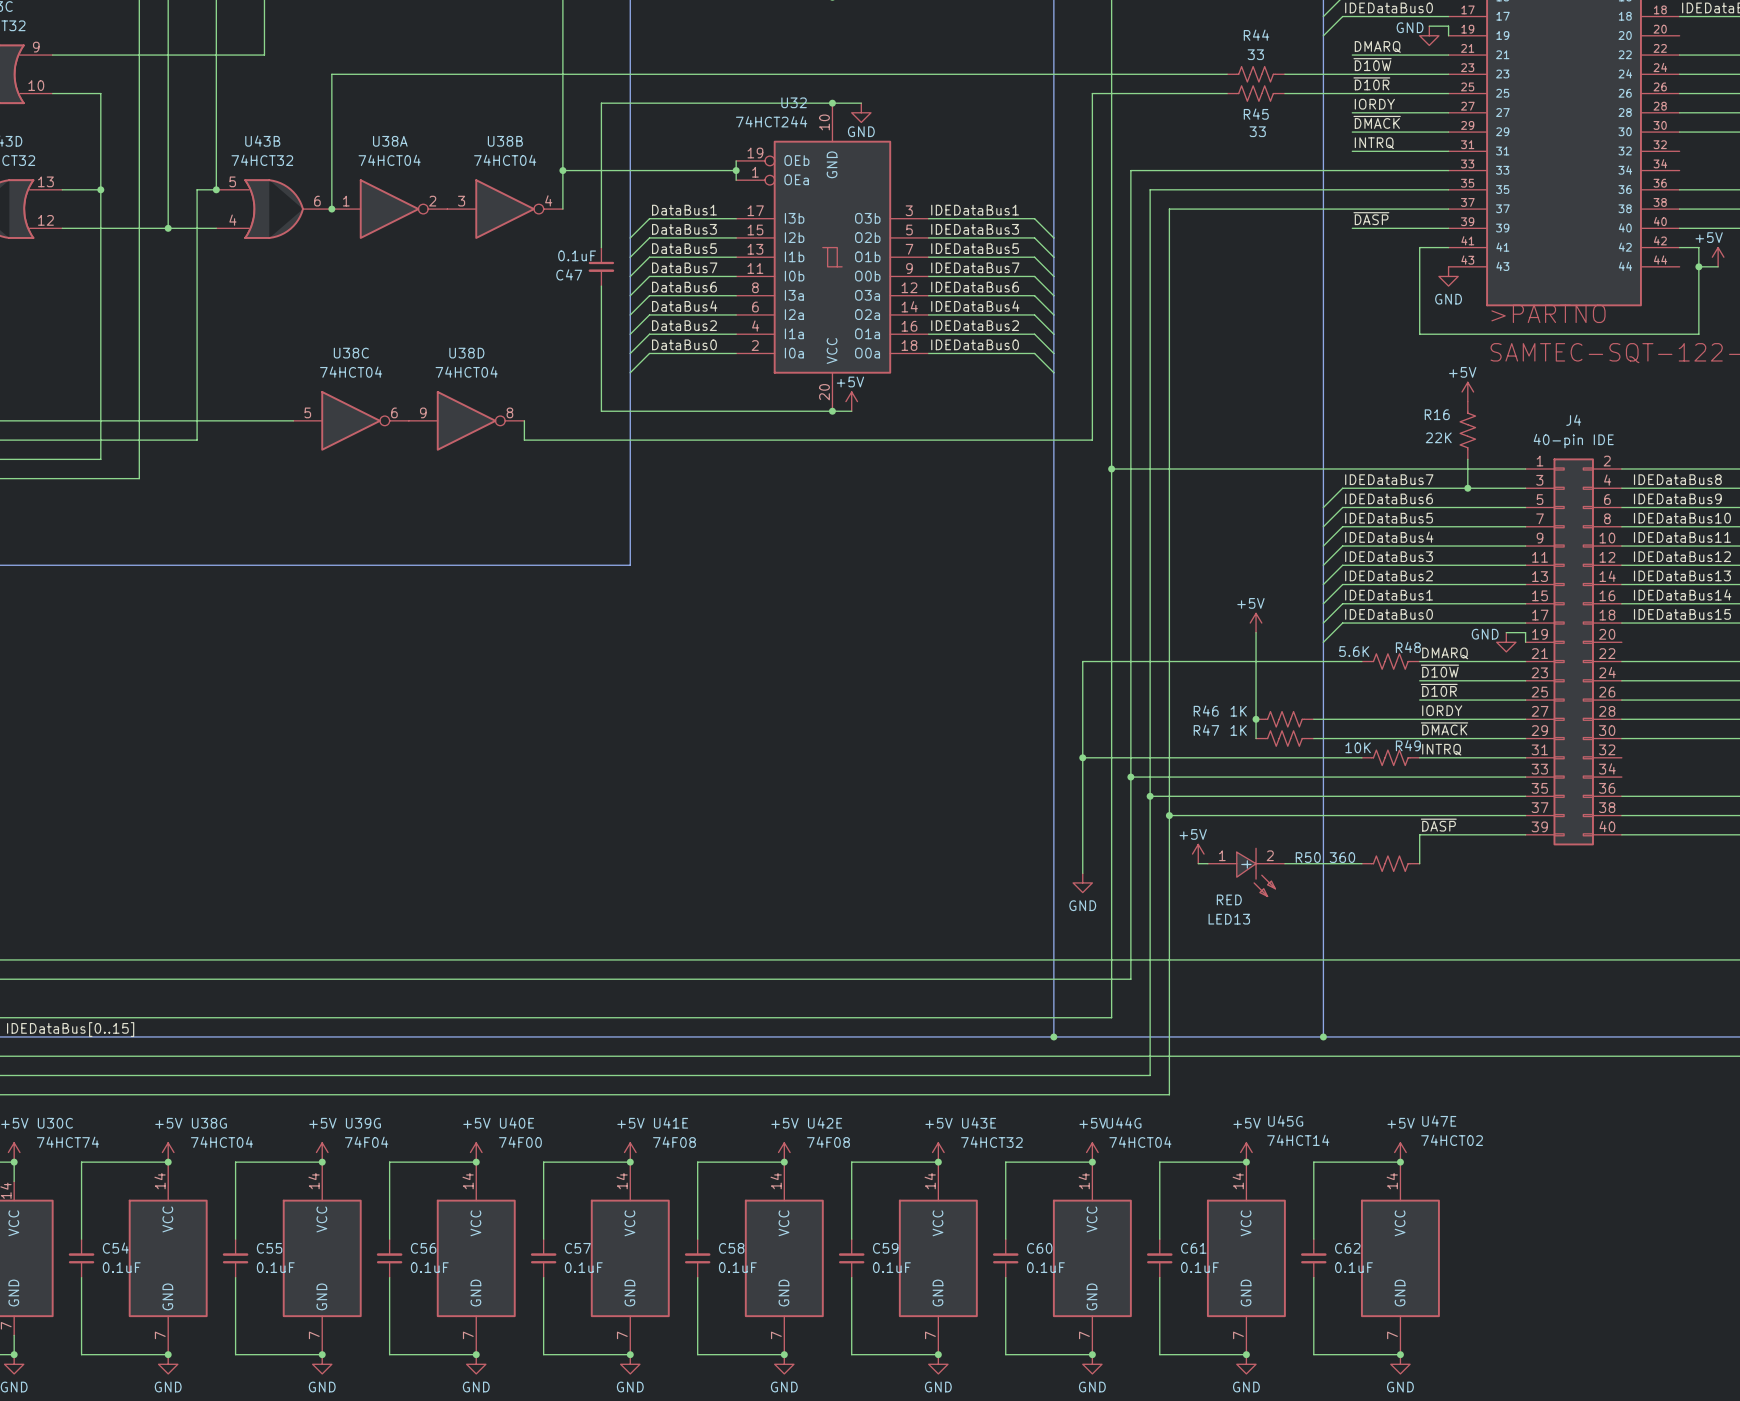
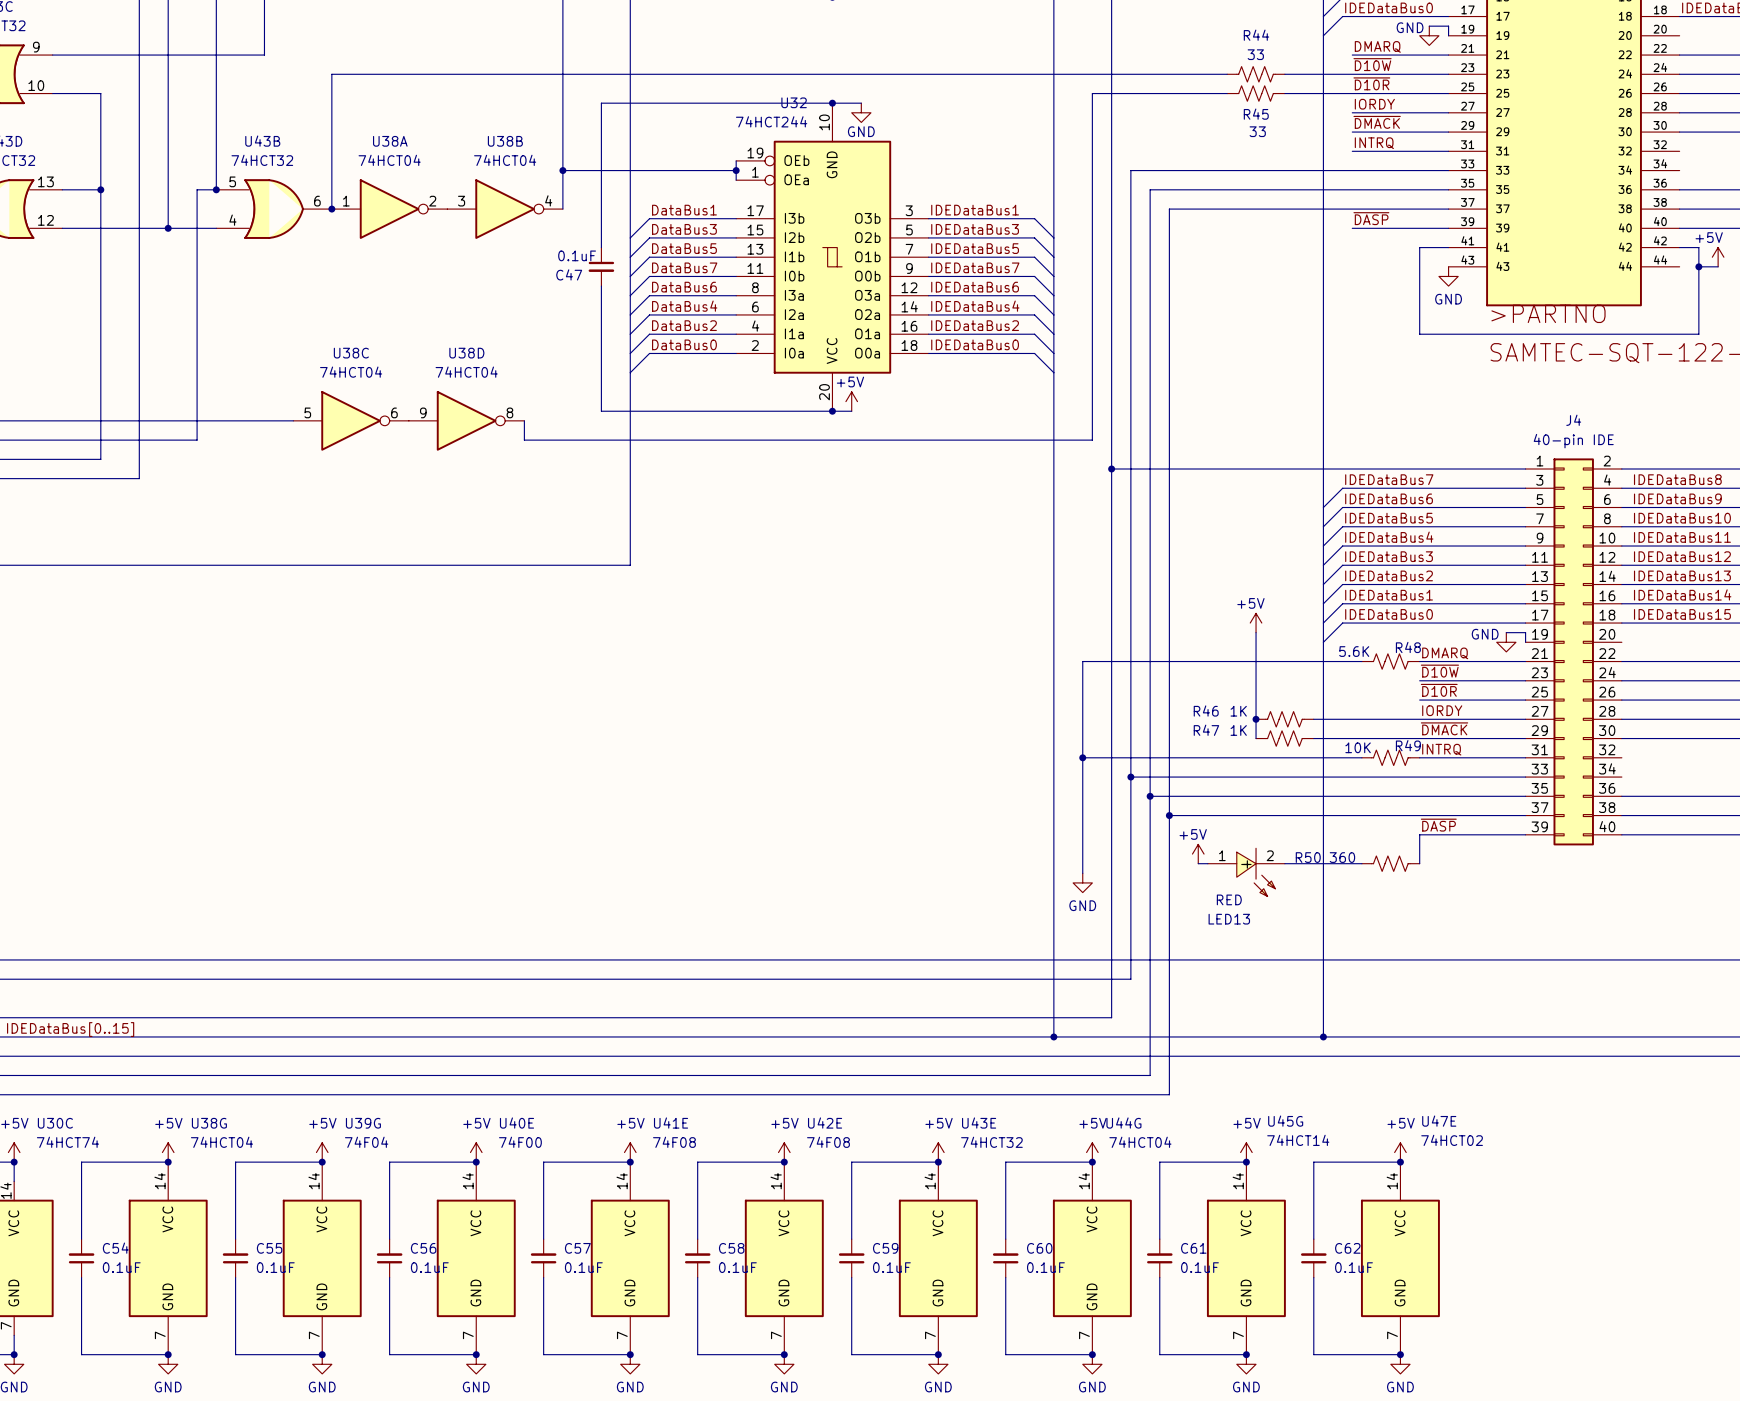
power symbol: +5V (1467, 391) -> none
R16: 22K (1467, 430) -> none
wire: (1467, 459) (1467, 488) -> none
junction: (1467, 488) -> none

